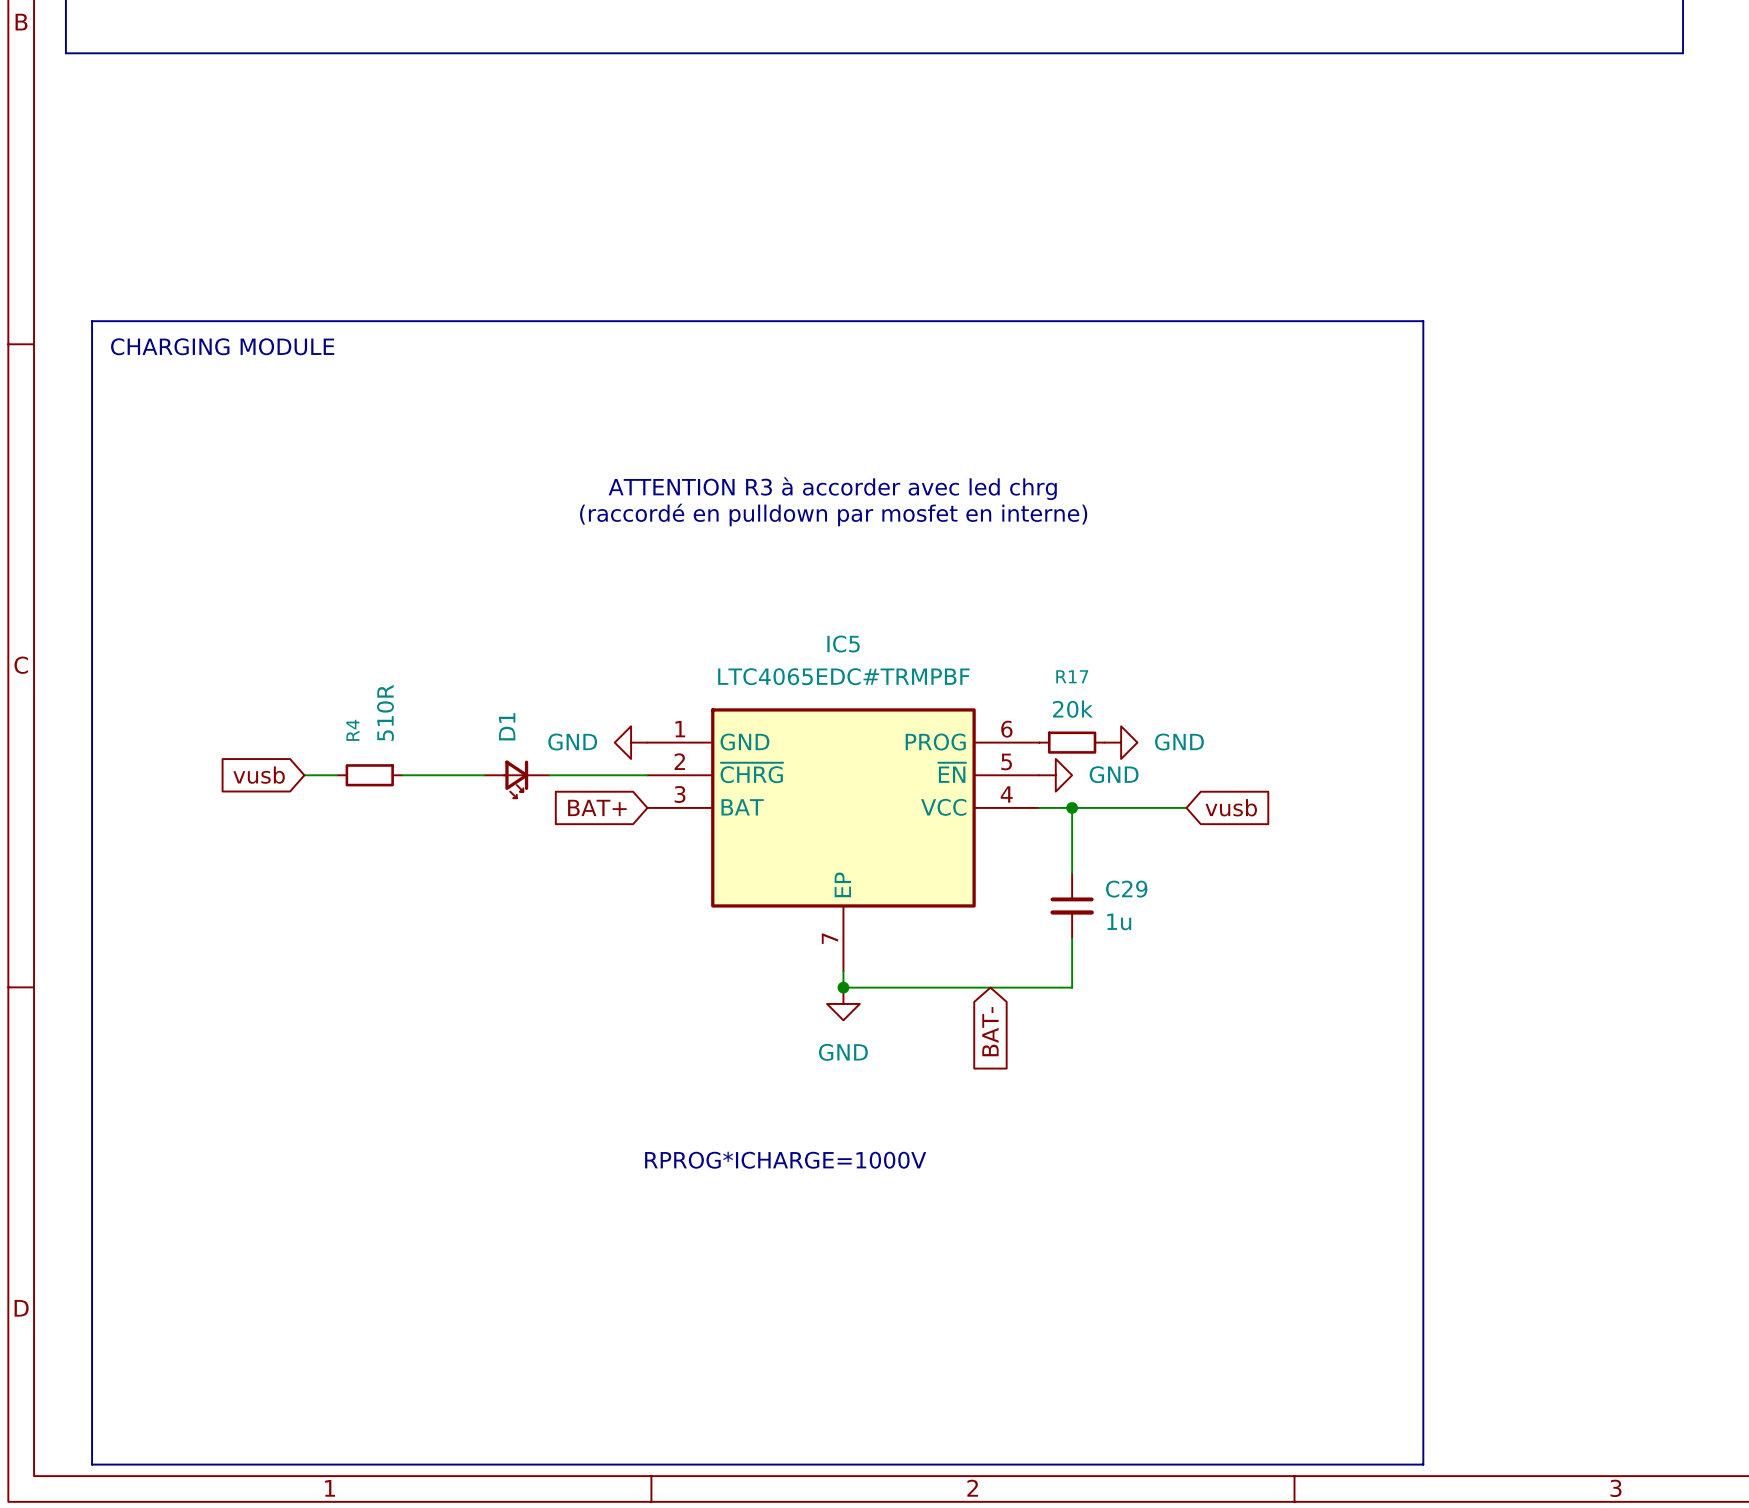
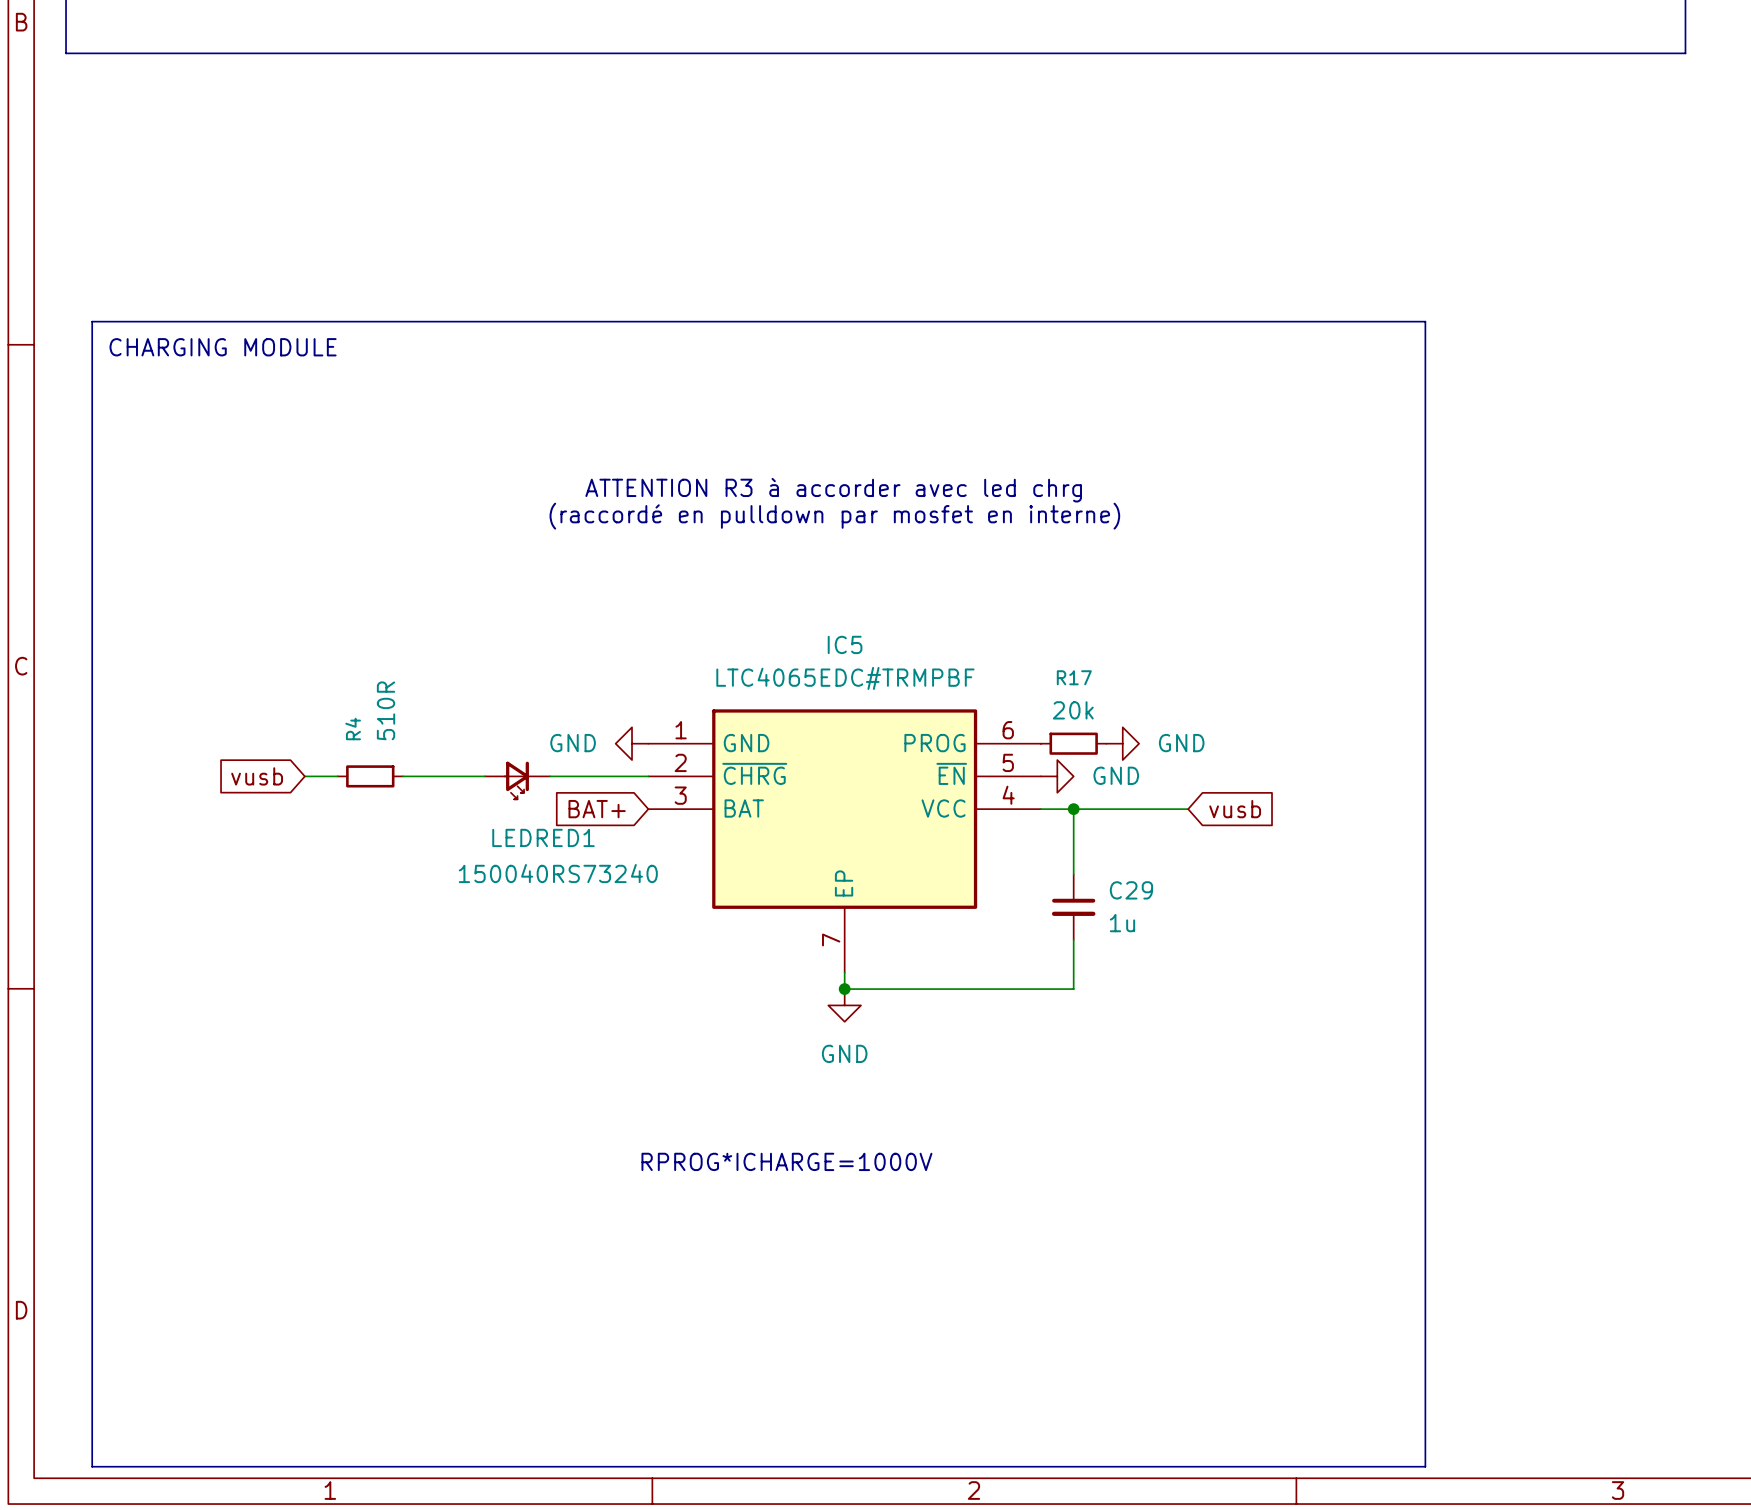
D1 name: D1 (507, 726) -> LEDRED1 (543, 837)
D1 value: none -> 150040RS73240 (558, 873)
global label: BAT- (990, 1031) -> none

